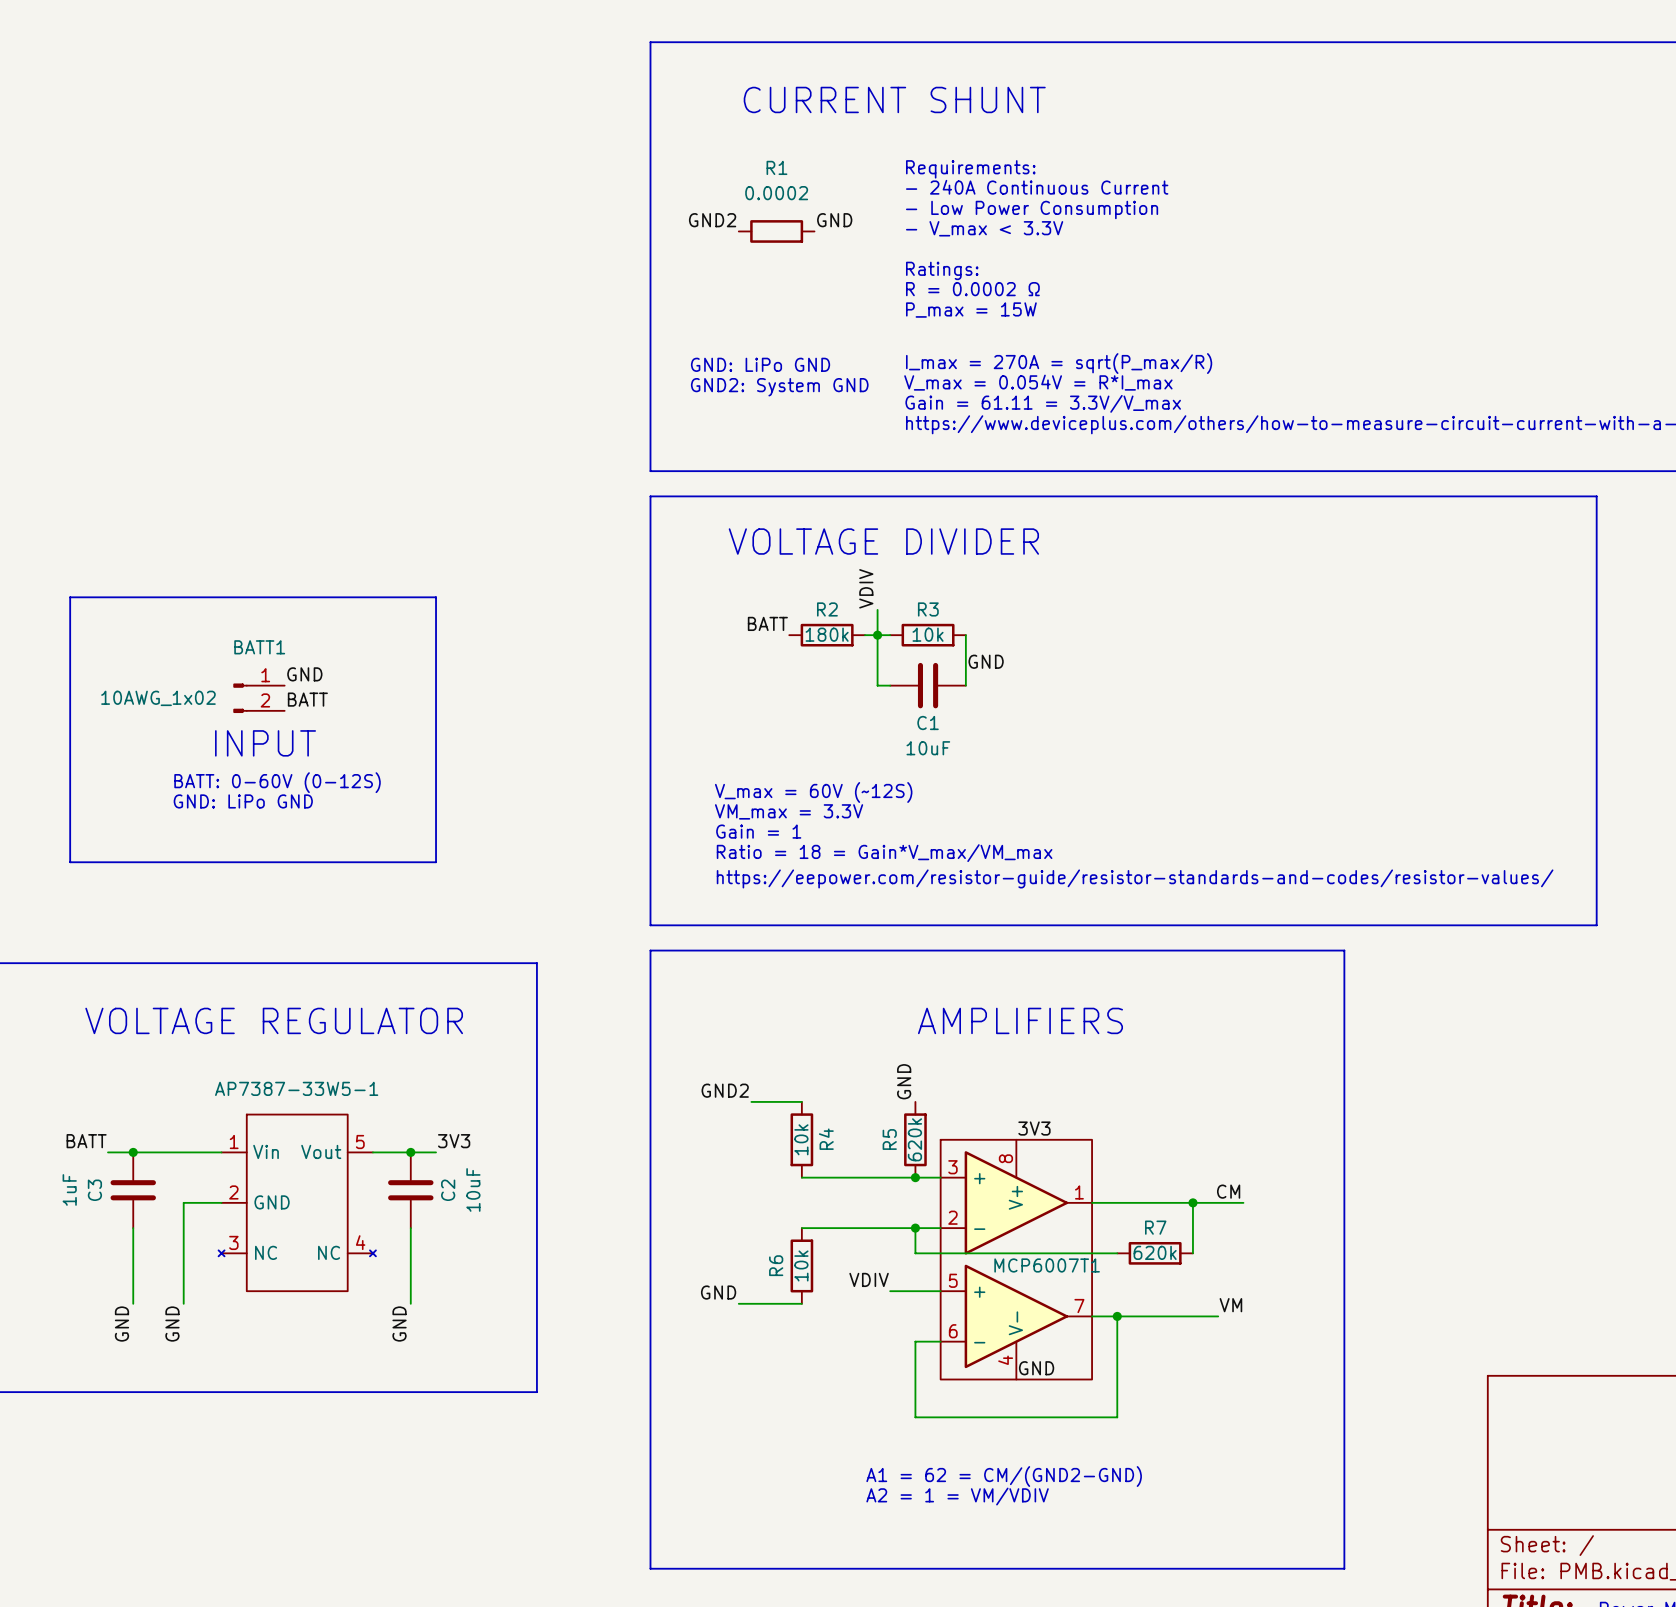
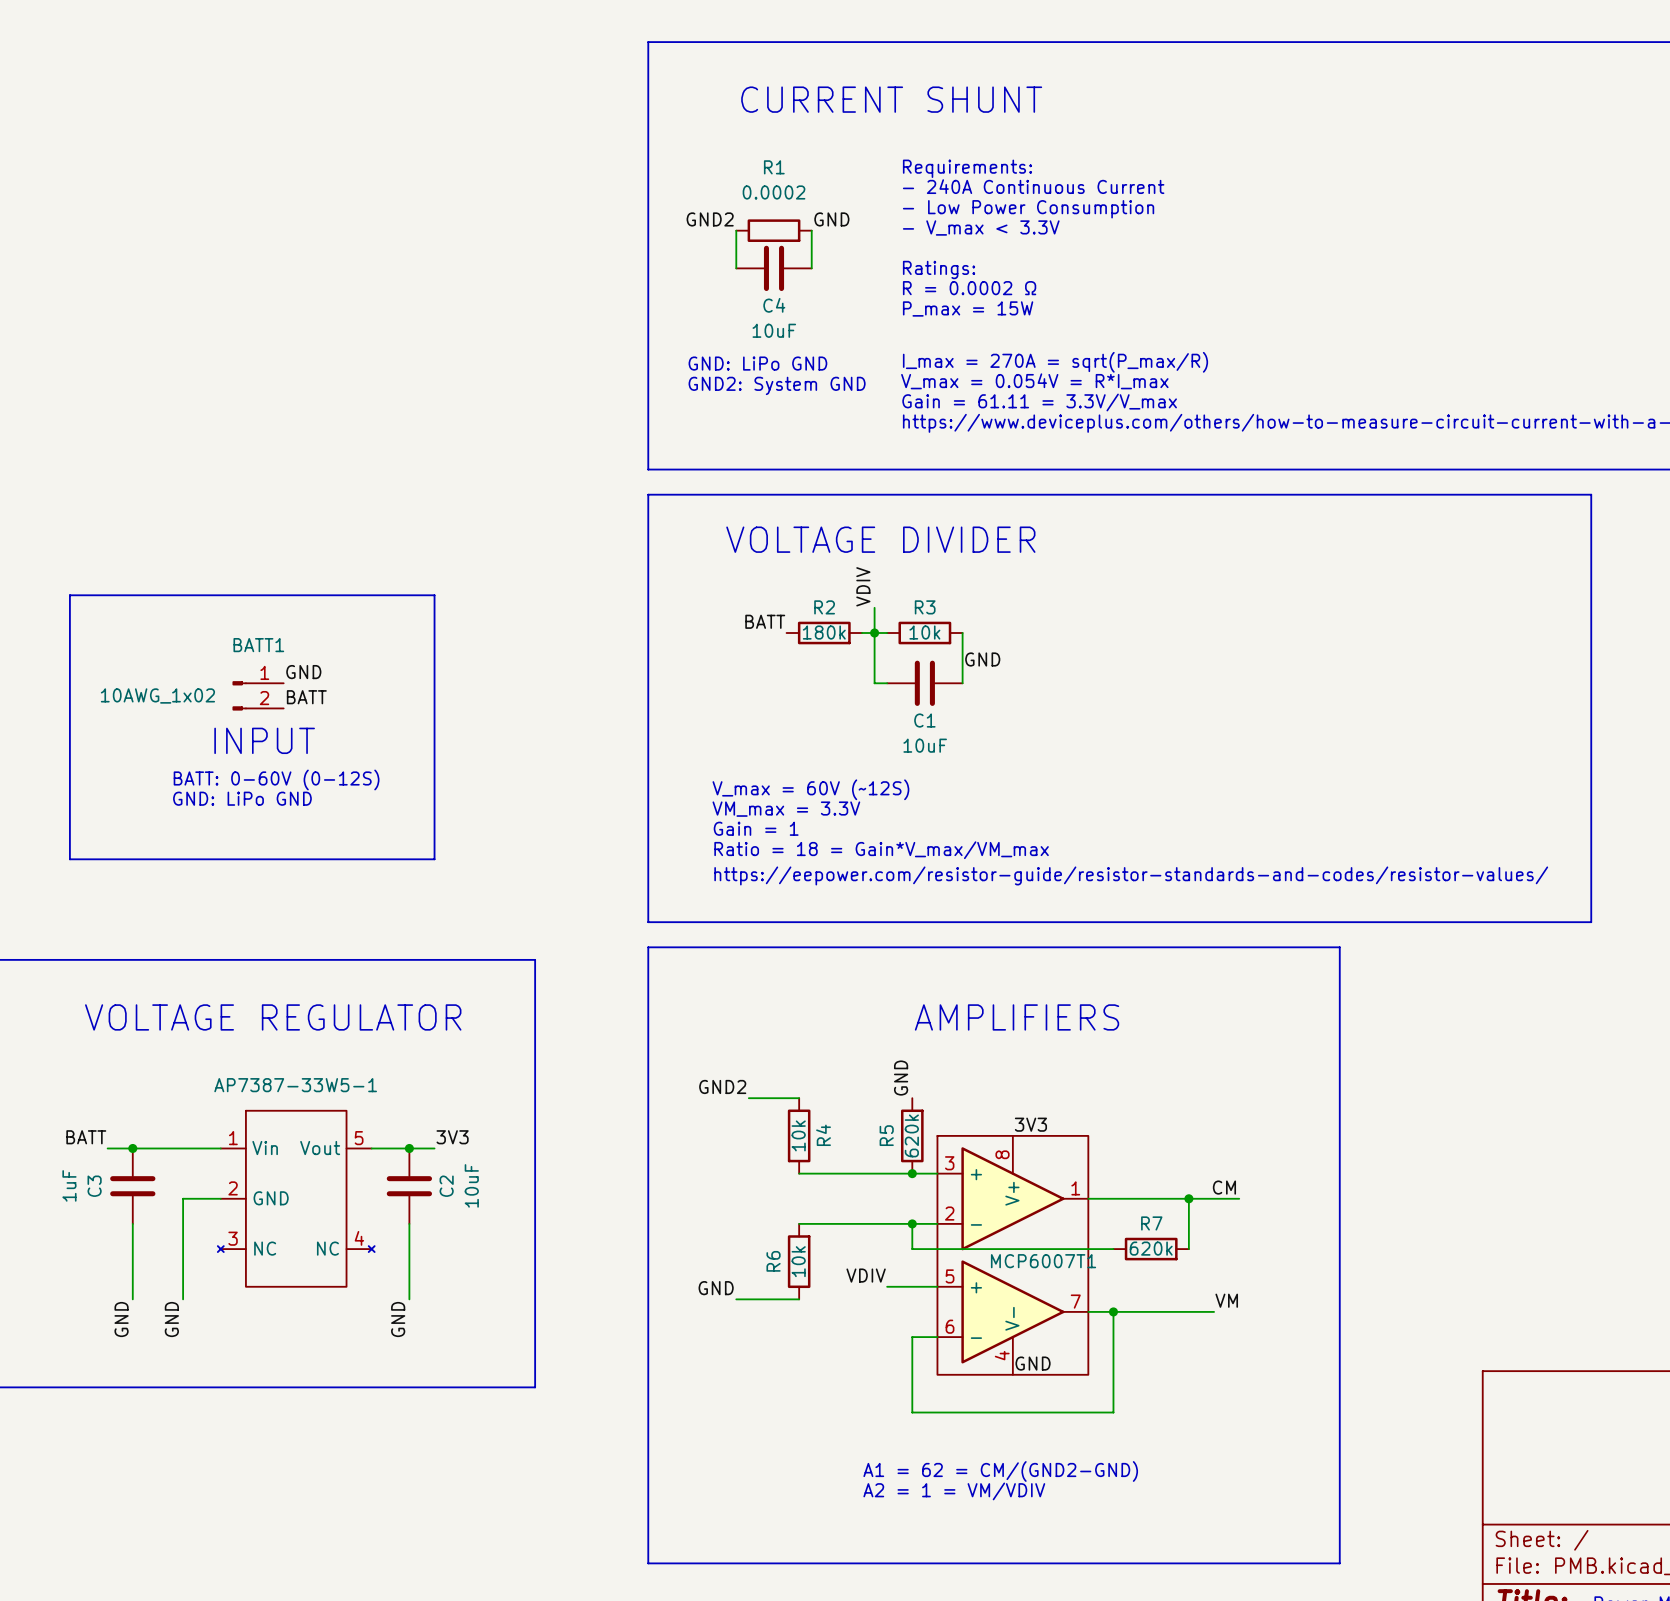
wire: none -> (736, 230) (736, 268)
wire: none -> (811, 230) (811, 268)
C4: none -> 10uF (774, 268)

